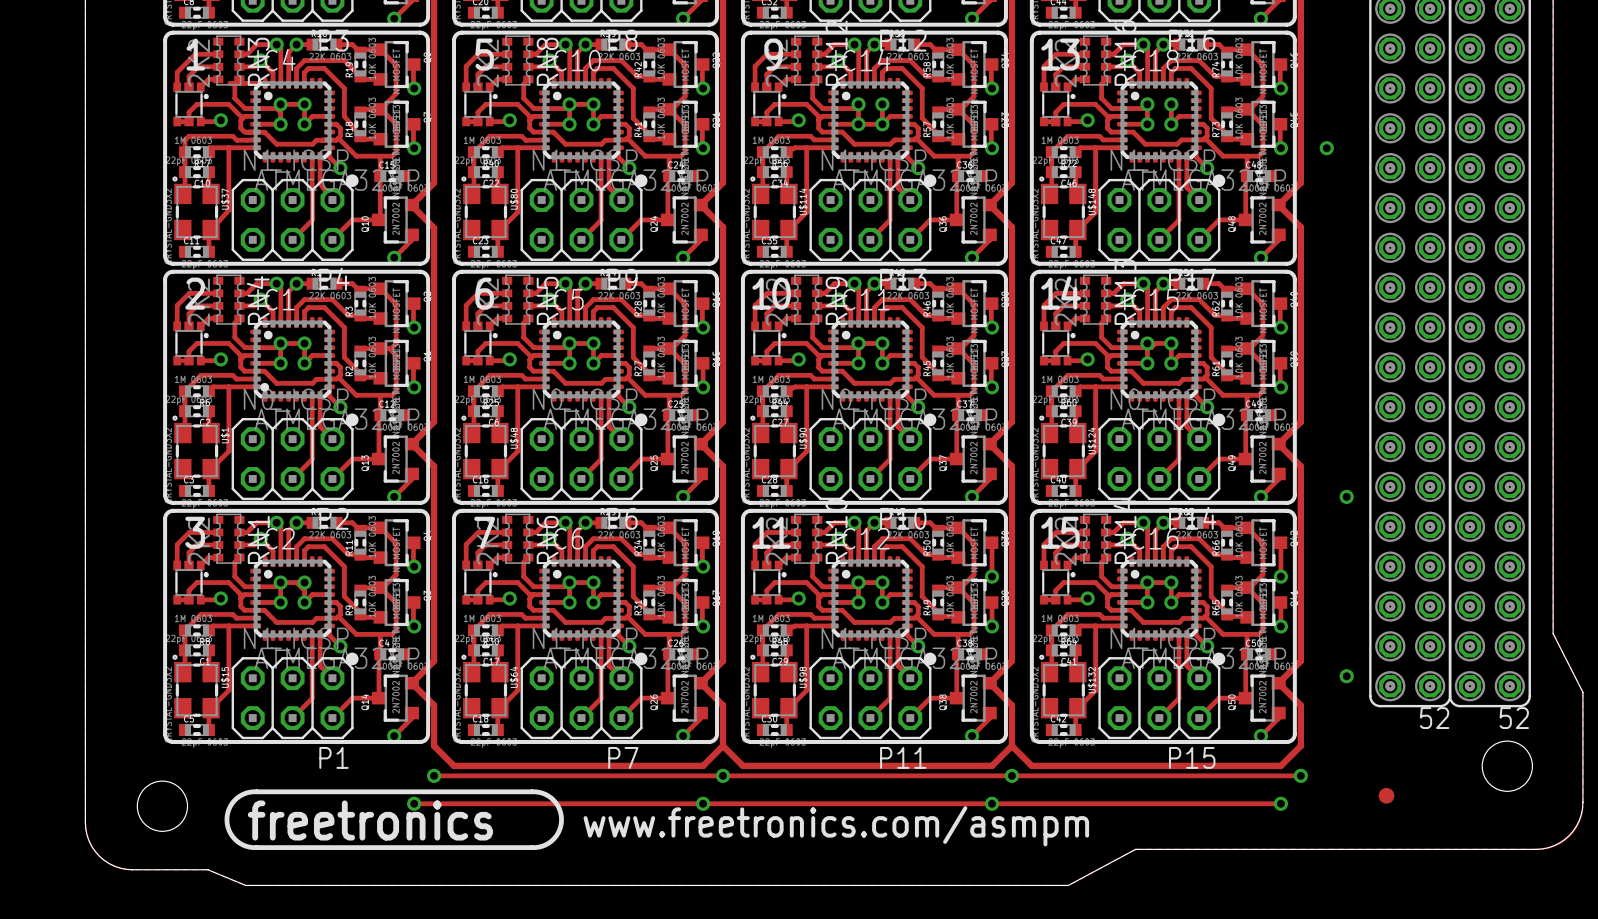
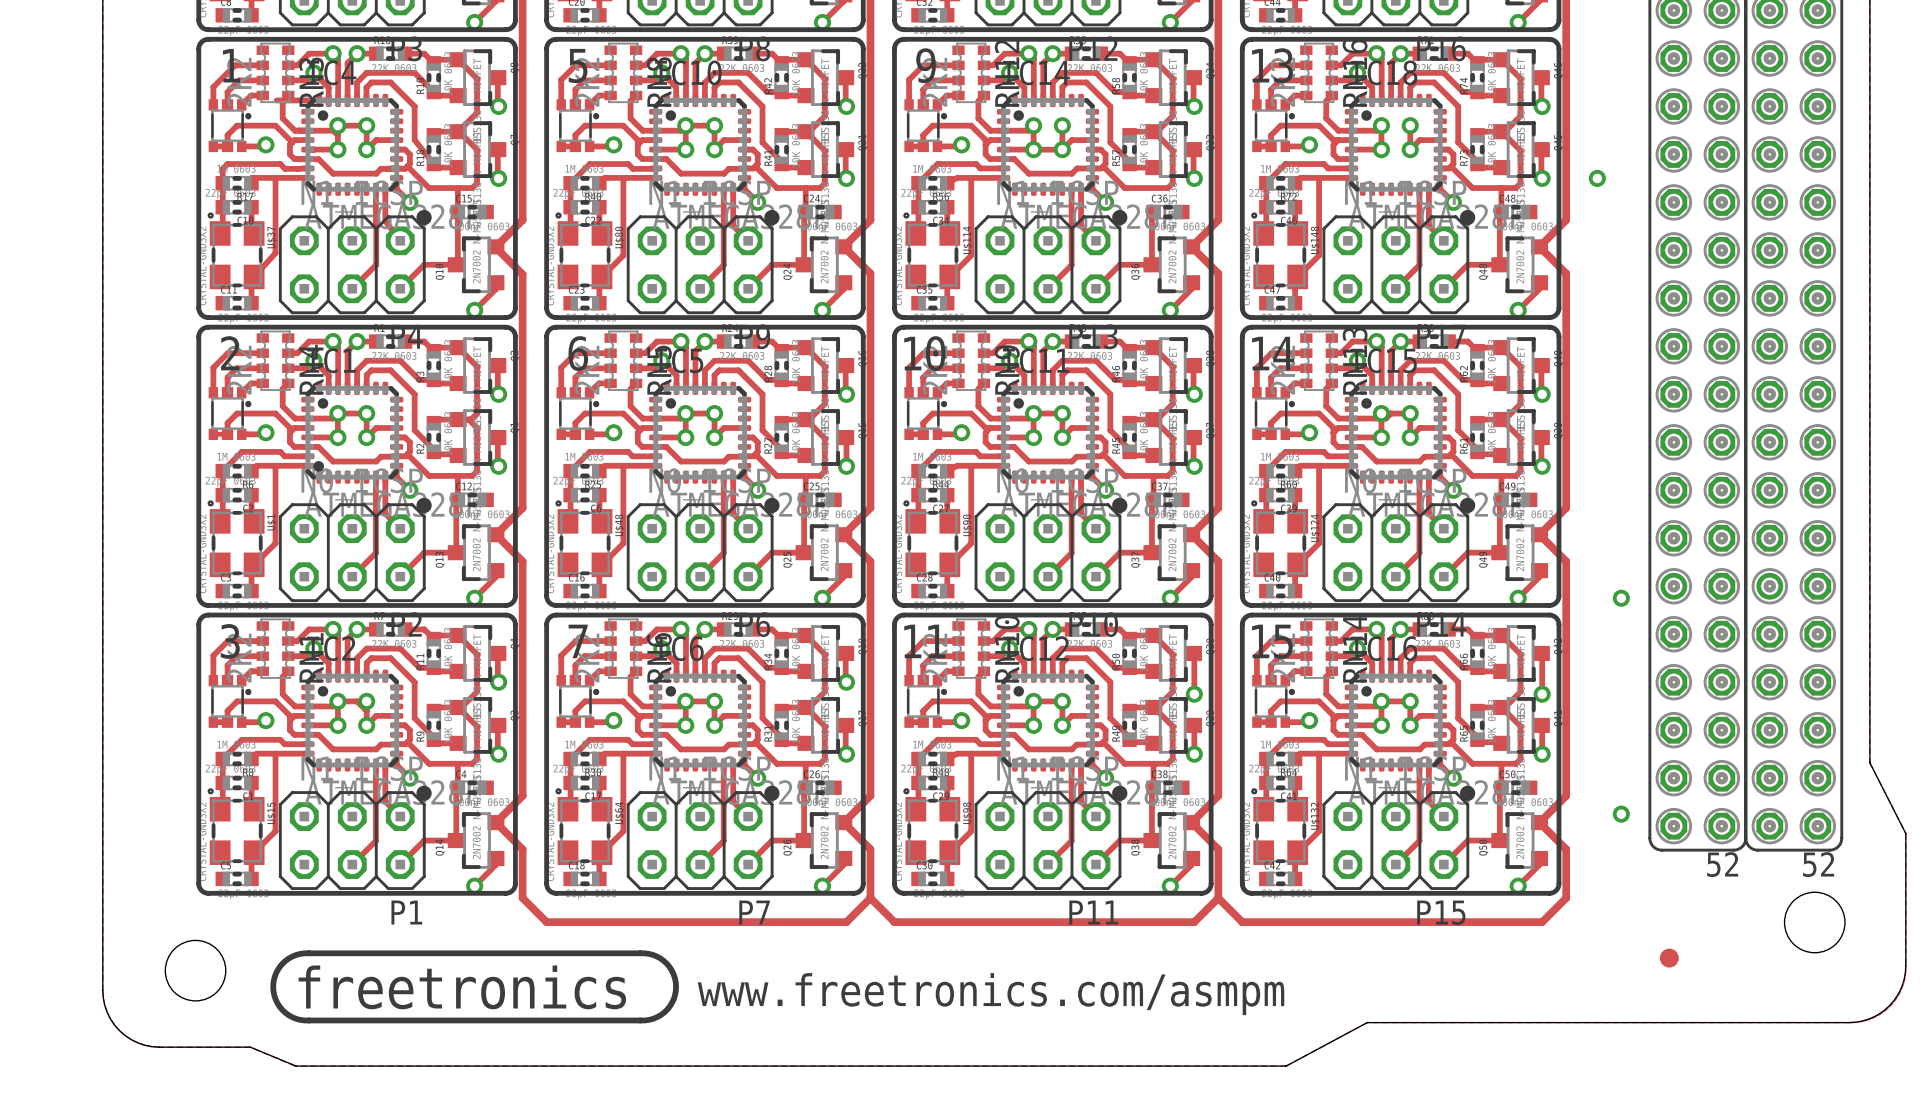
track: (1122, 132) (1133, 132) (1145, 144) (1177, 144) (1181, 139) (1196, 139) -> none
track: (958, 156) (958, 176) -> none
track: (434, 775) (1300, 775) -> none
via: (434, 775) -> none
via: (723, 775) -> none
via: (1011, 775) -> none
via: (1300, 775) -> none
track: (414, 803) (1280, 803) -> none
via: (414, 803) -> none
via: (703, 803) -> none
via: (992, 803) -> none
via: (1280, 803) -> none

